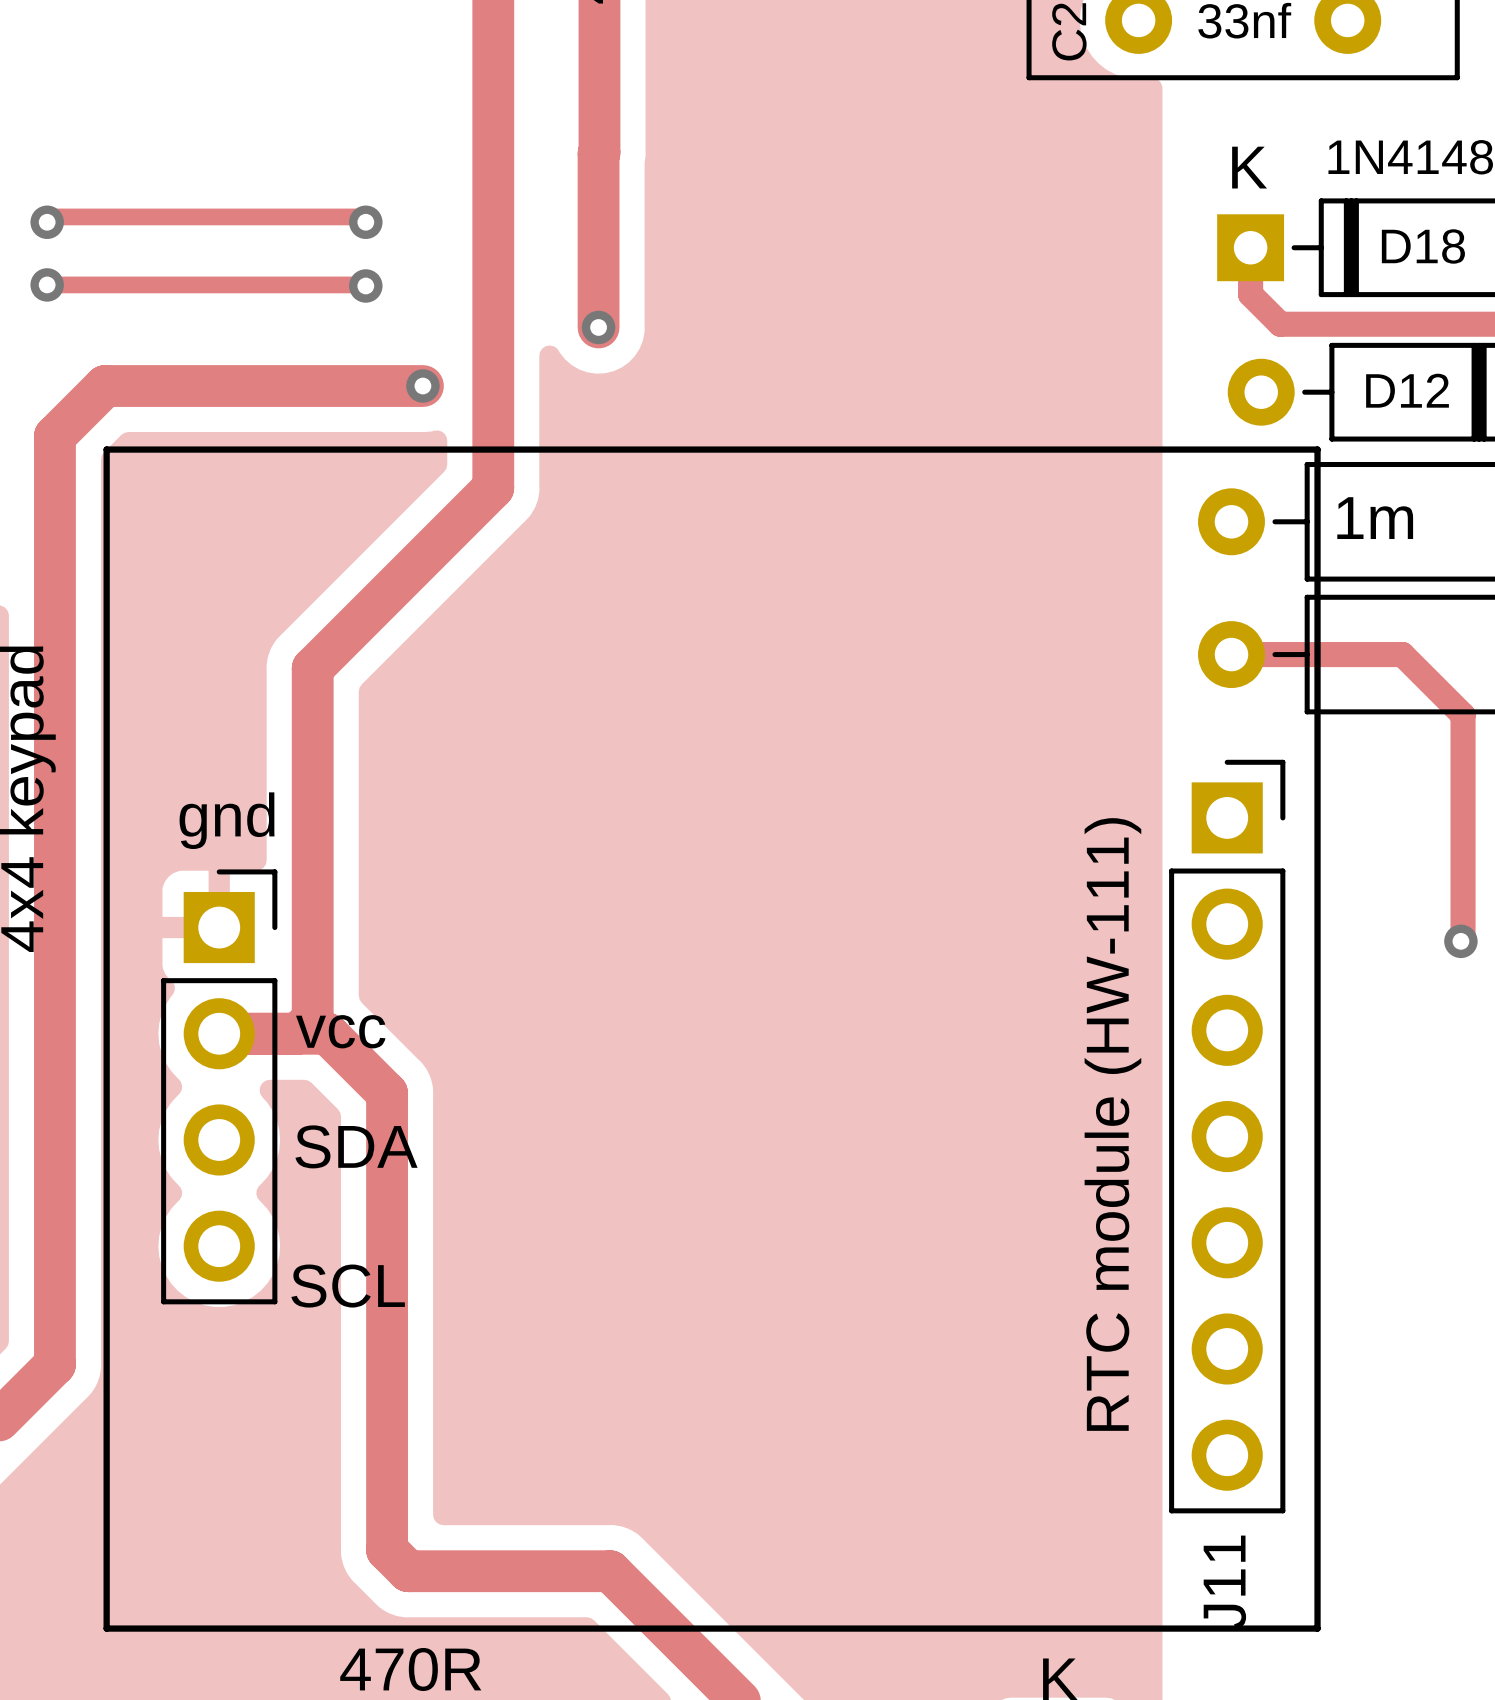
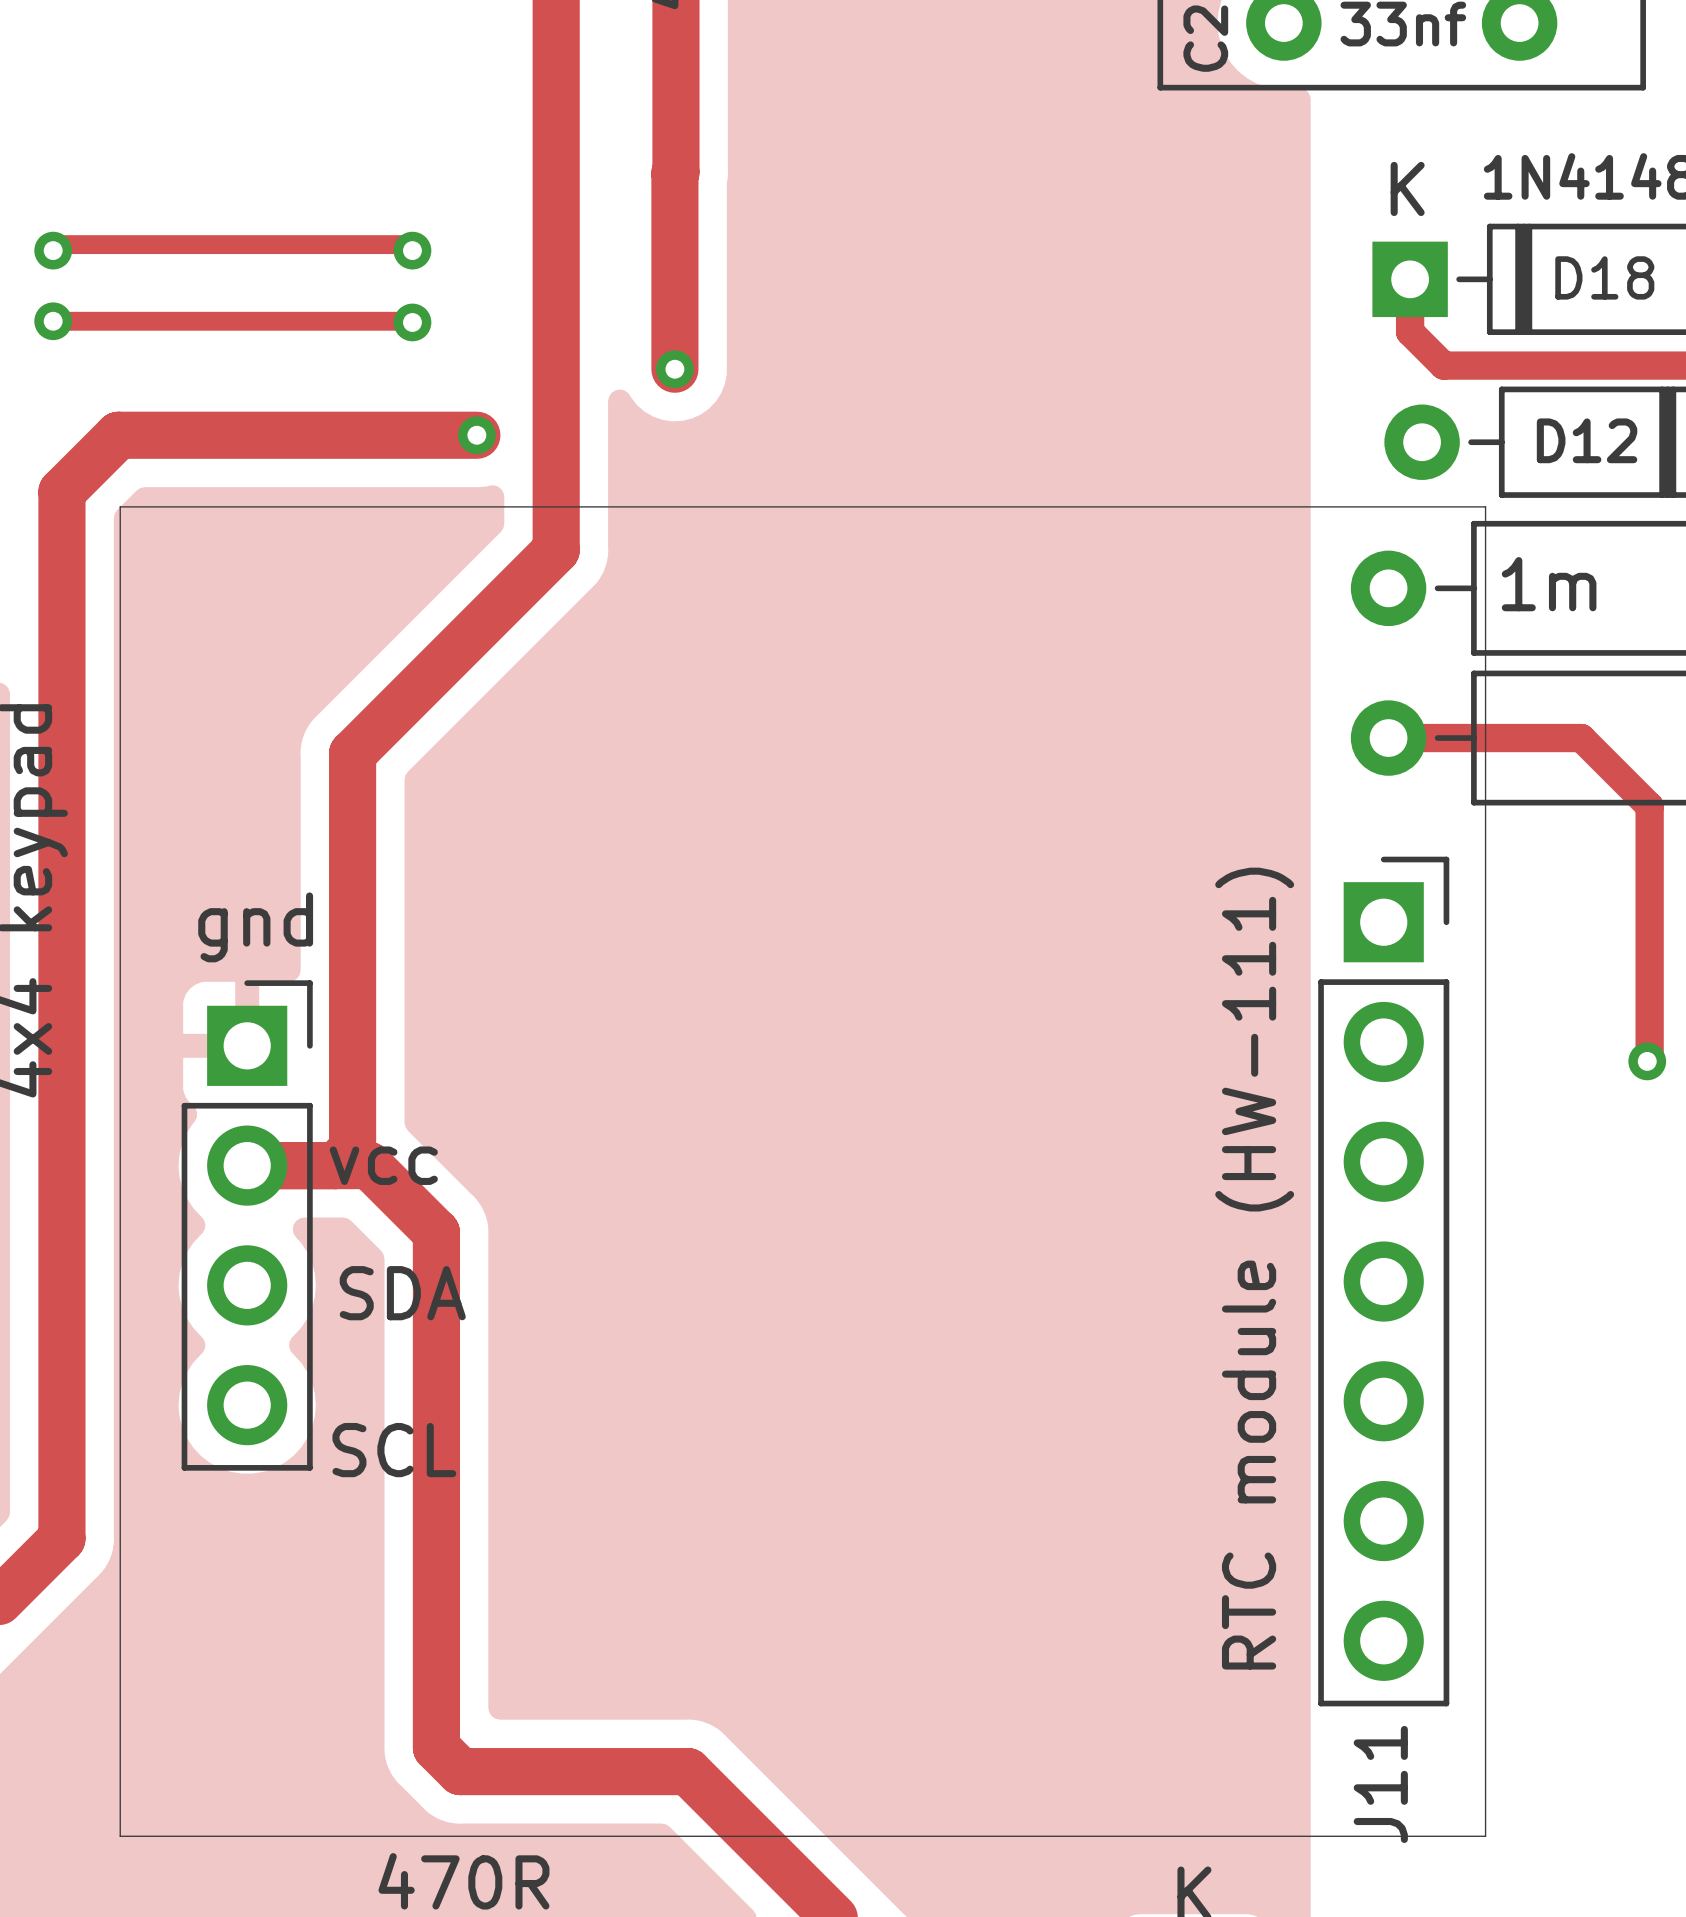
line width: thick (106, 449) (1317, 449) (1317, 1628) (106, 1628) (106, 449) -> thin (120, 506) (1485, 506) (1485, 1836) (120, 1836) (120, 506)

